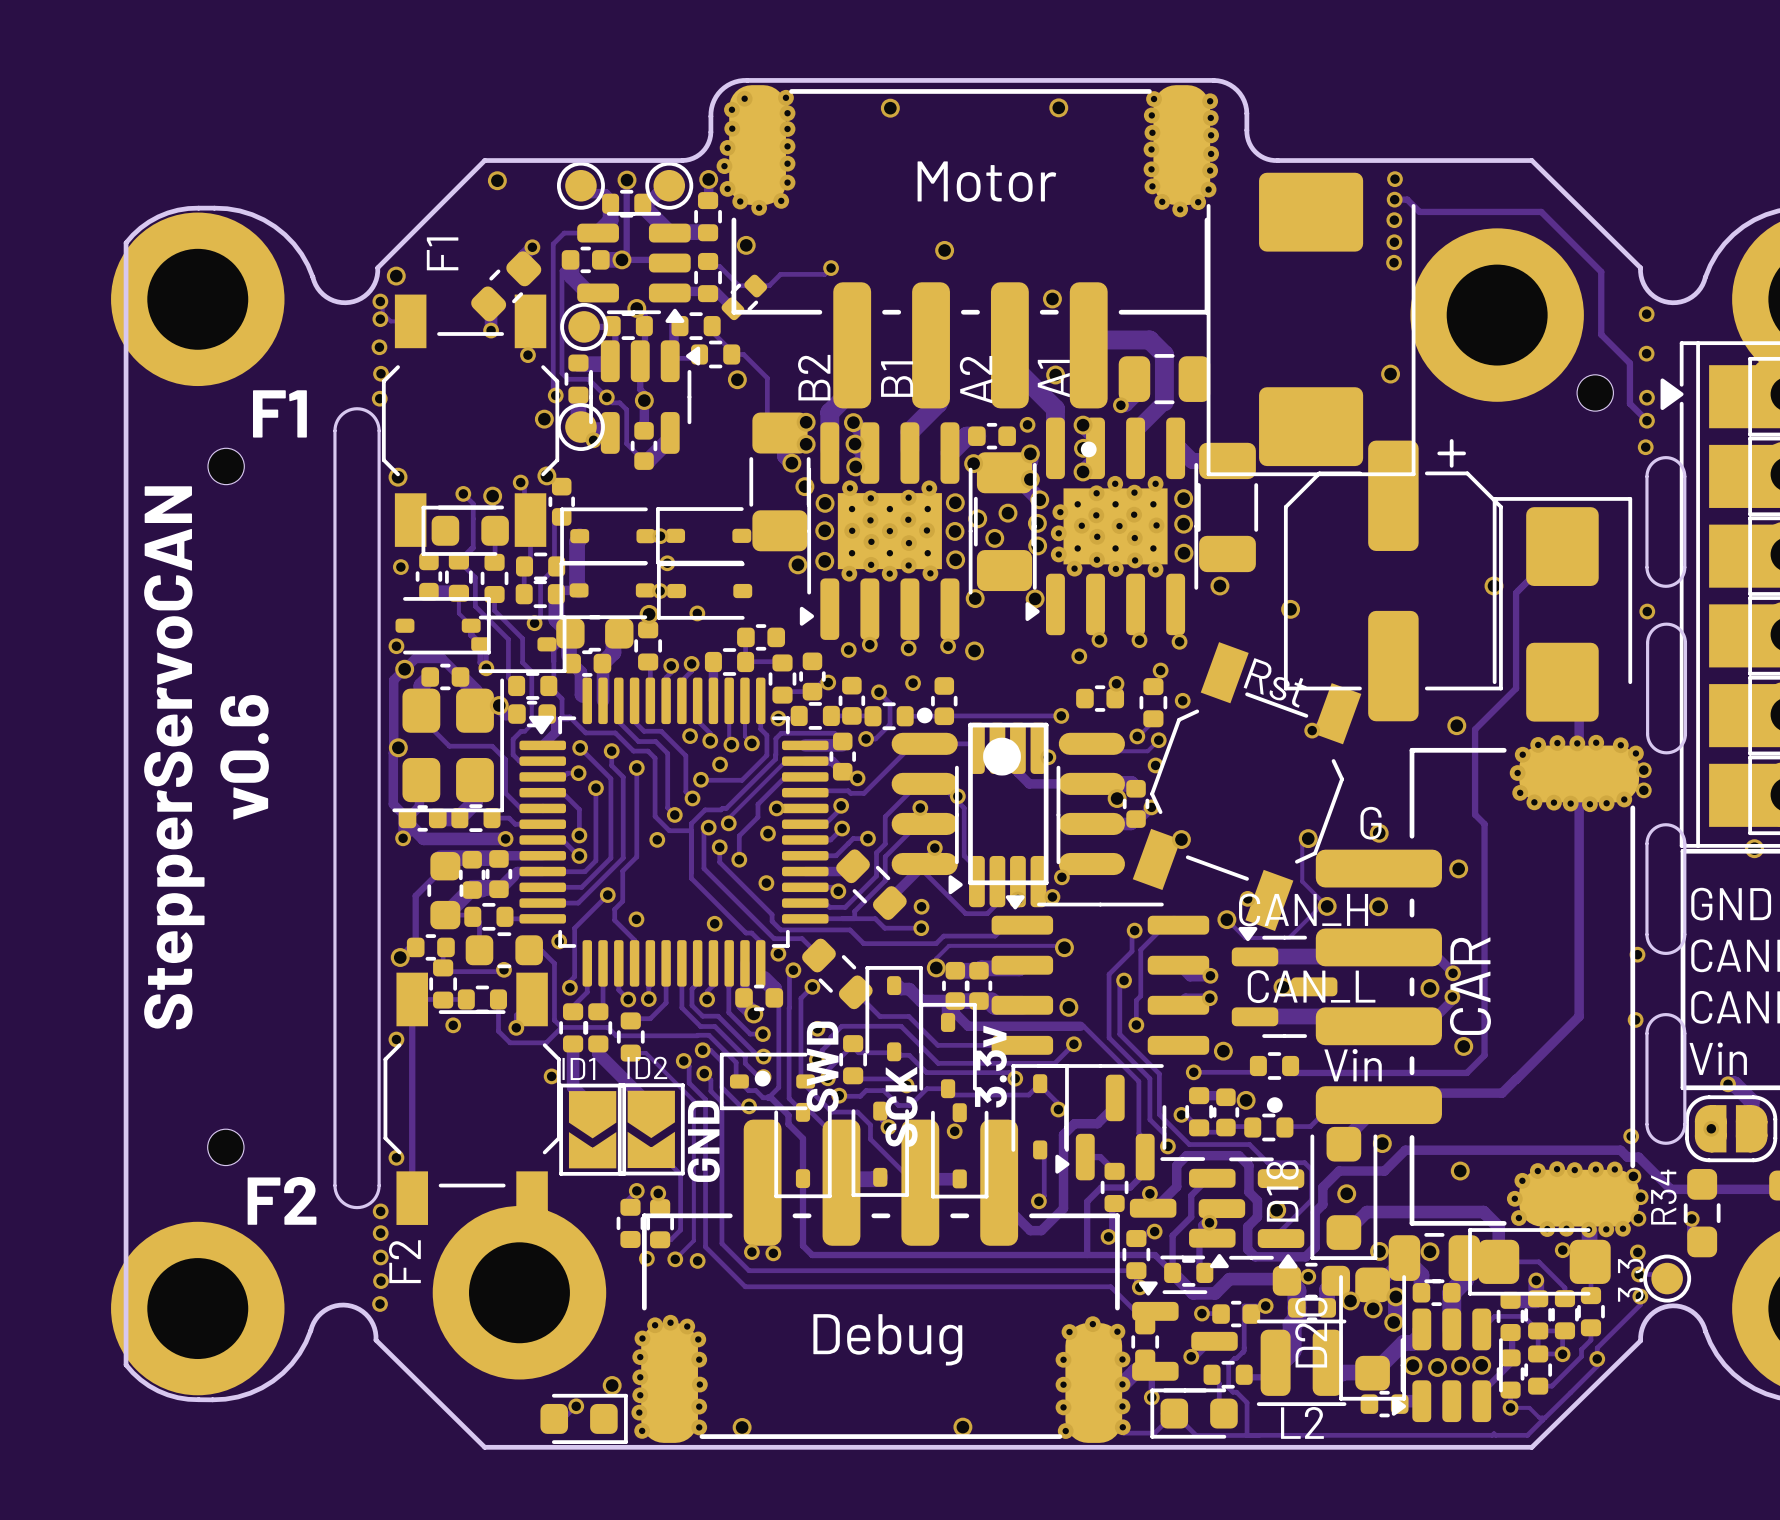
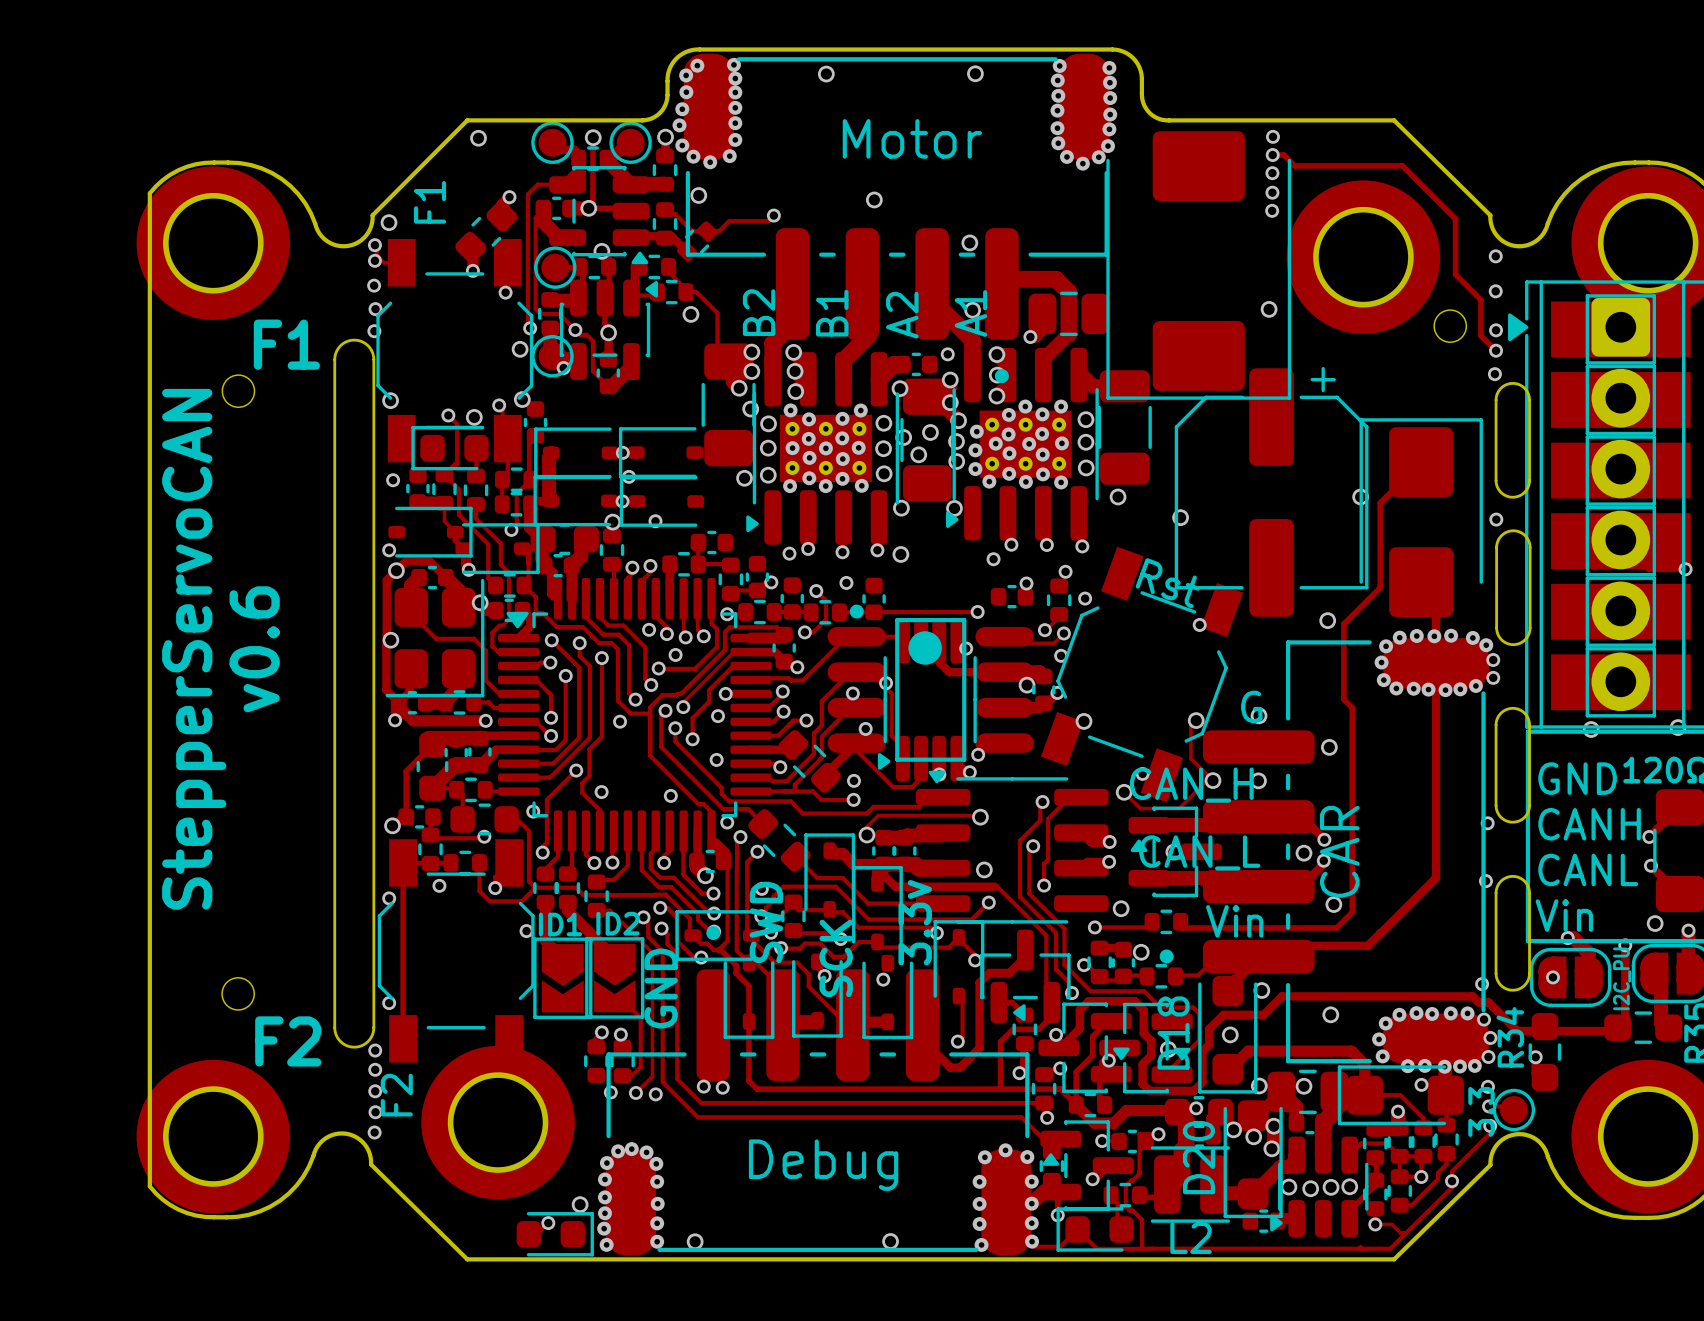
part footprint: [577, 211, 691, 323] -> [549, 165, 650, 265]
part footprint: [589, 340, 701, 454] -> [559, 279, 659, 381]
part footprint: [1231, 926, 1338, 1038] -> [1128, 806, 1223, 898]
part footprint: [1055, 1074, 1167, 1181] -> [980, 929, 1071, 1024]
part footprint: [1129, 1157, 1236, 1269] -> [1038, 1002, 1132, 1093]
part footprint: [1198, 1157, 1305, 1269] -> [1099, 1002, 1193, 1094]
part footprint: [1132, 1281, 1238, 1393] -> [1040, 1120, 1134, 1211]

